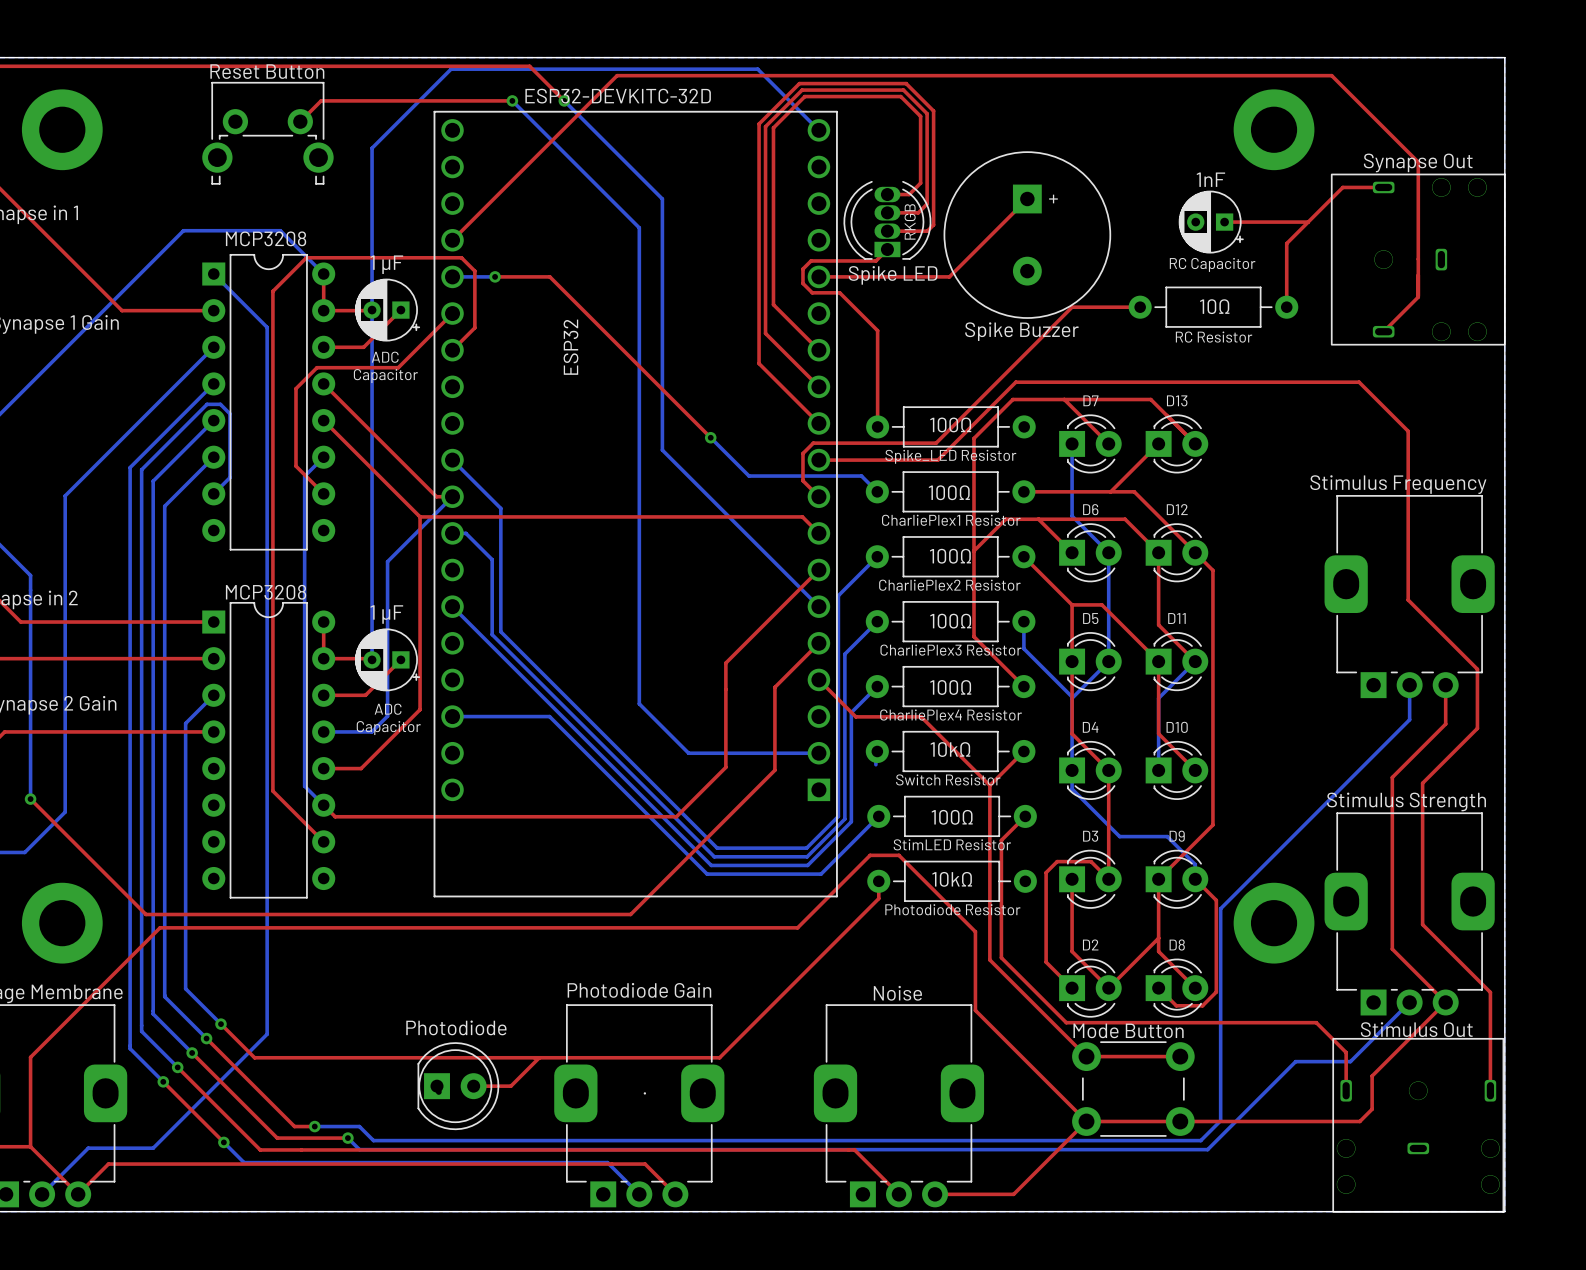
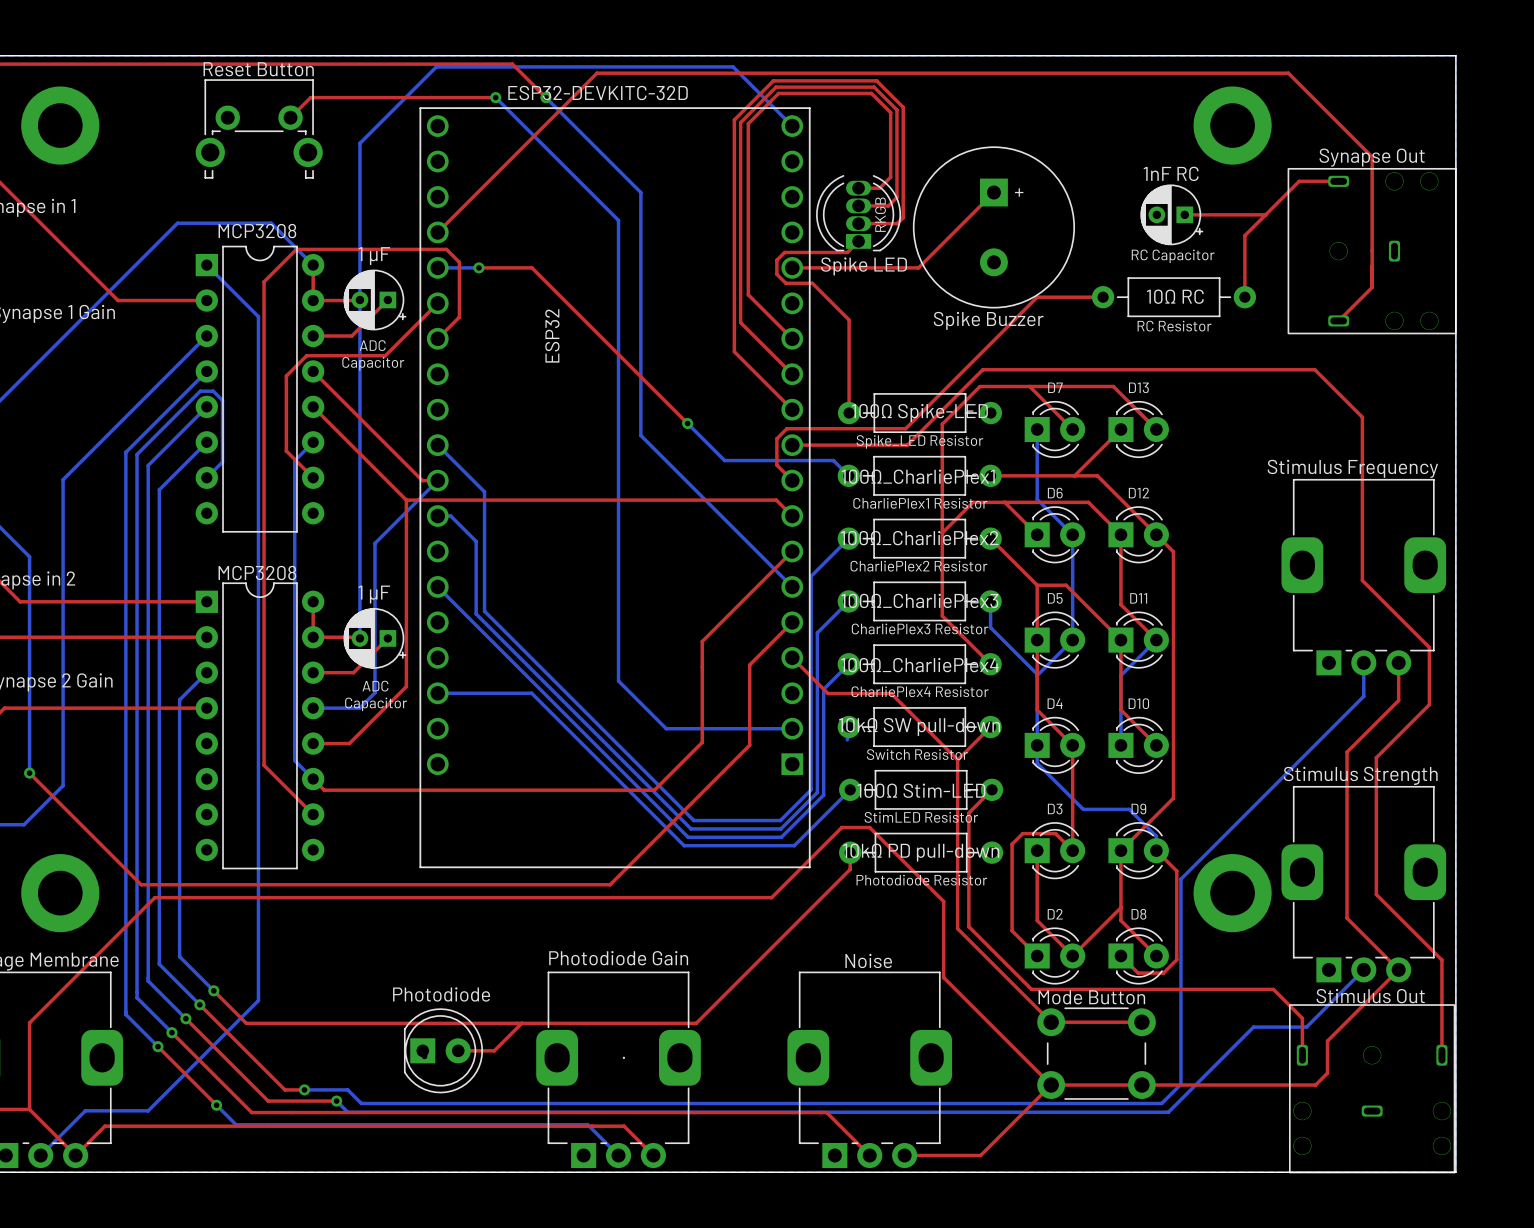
part value: 1nF (1210, 179) -> 1nF RC (1171, 173)
part value: 10Ω (1214, 306) -> 10Ω RC (1175, 296)
part value: 100Ω (950, 424) -> 100Ω Spike-LED (919, 412)
part value: 100Ω (949, 492) -> 100Ω_CharliePlex1 (918, 476)
part value: 100Ω (950, 556) -> 100Ω_CharliePlex2 (919, 538)
part value: 100Ω (950, 621) -> 100Ω_CharliePlex3 (919, 600)
part value: 100Ω (950, 687) -> 100Ω_CharliePlex4 (919, 665)
part value: 10kΩ (950, 749) -> 10kΩ SW pull-down (919, 726)
part value: 100Ω (952, 817) -> 100Ω Stim-LED (921, 790)
part value: 10kΩ (952, 879) -> 10kΩ PD pull-down (921, 852)

